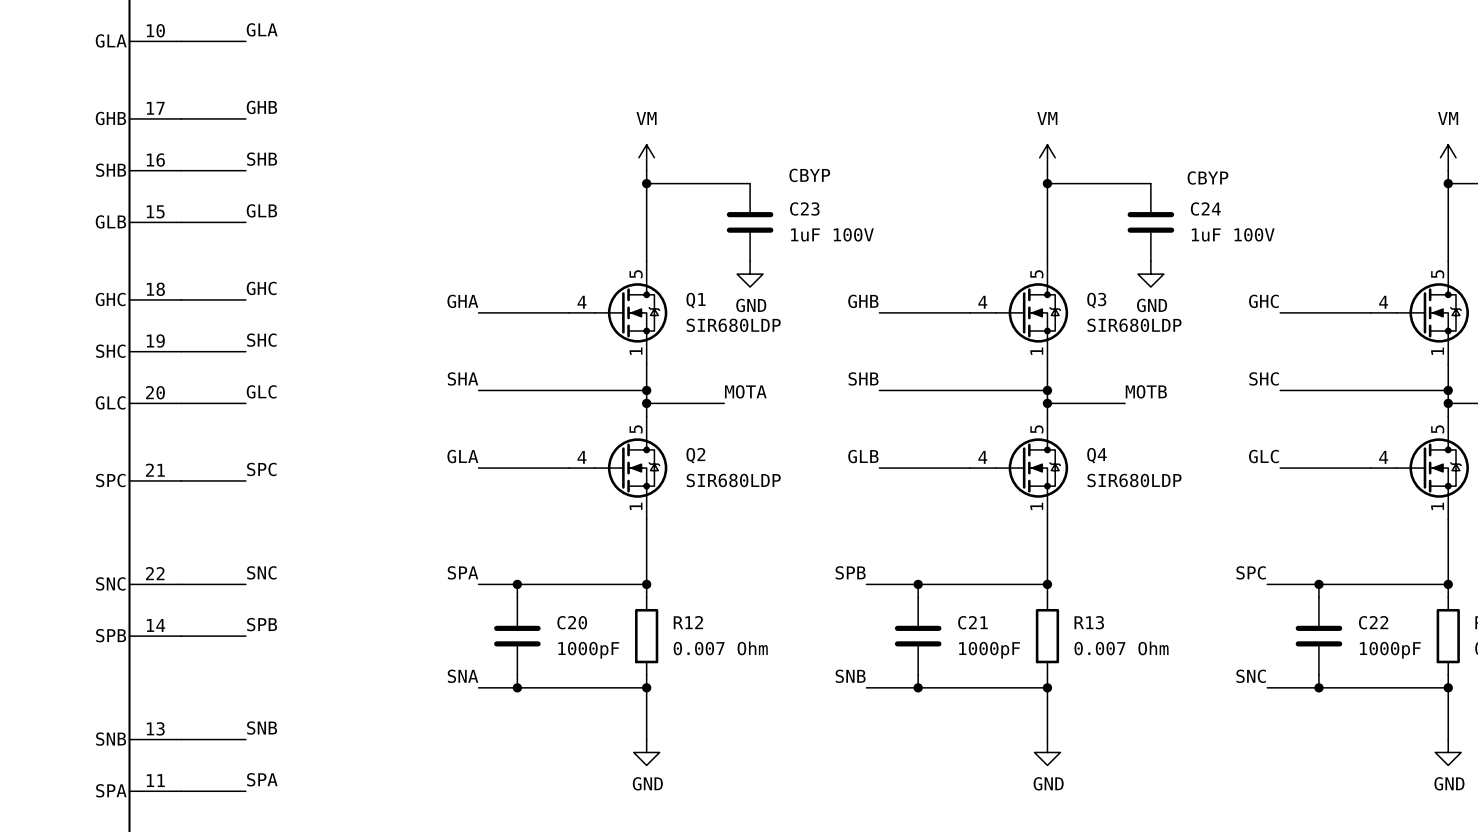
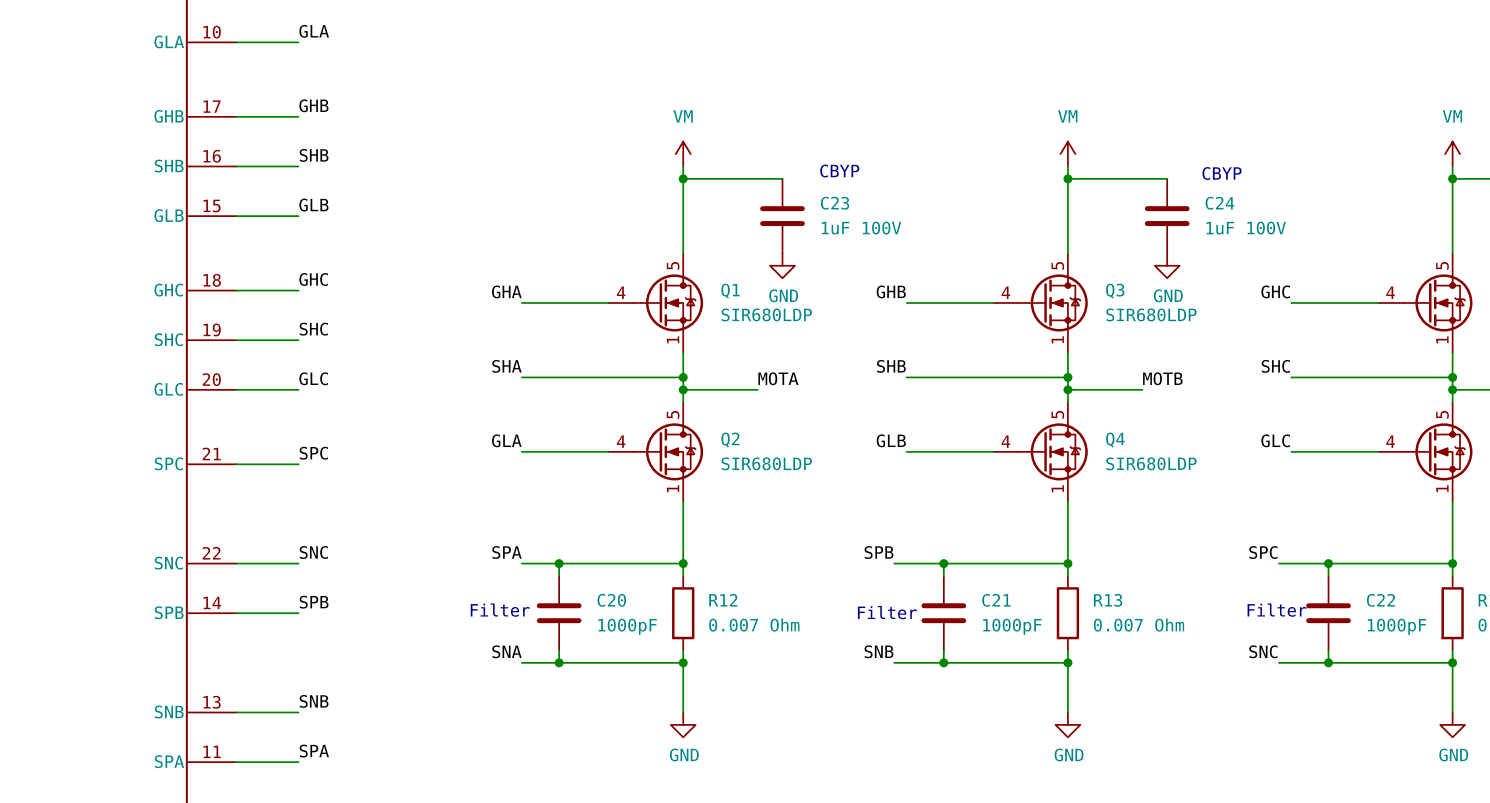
text: none -> Filter (500, 610)
text: none -> Filter (1277, 610)
text: none -> Filter (887, 612)

